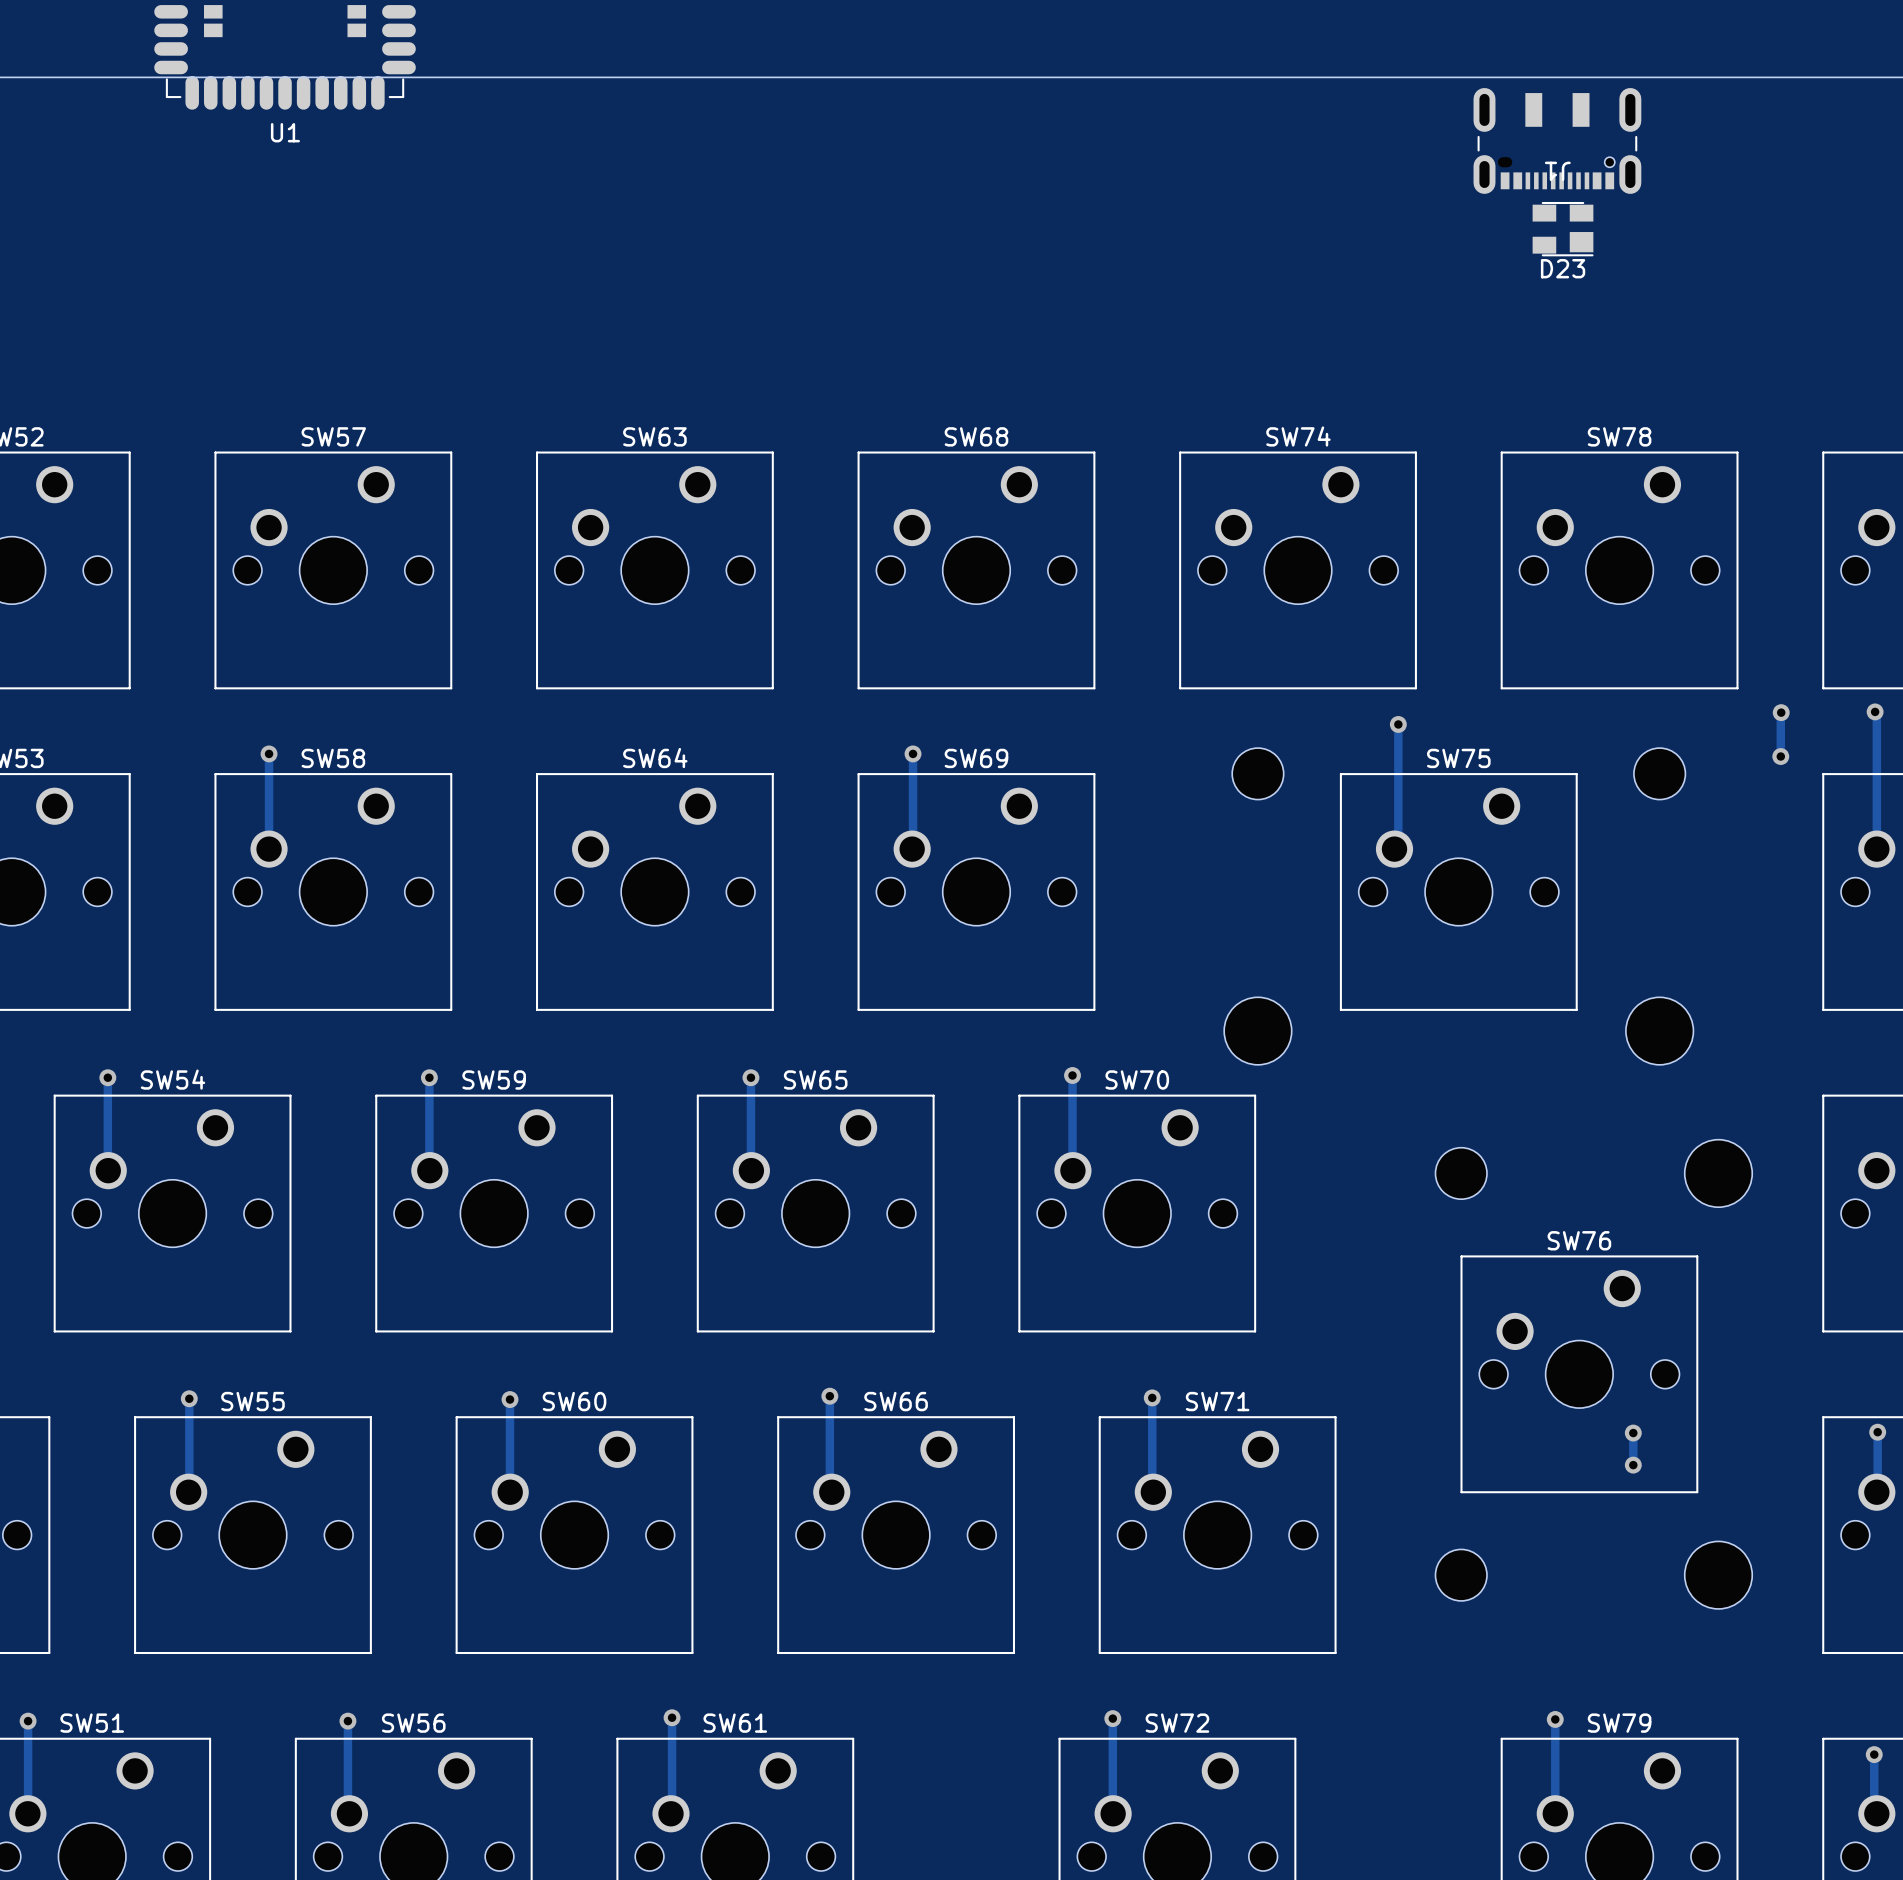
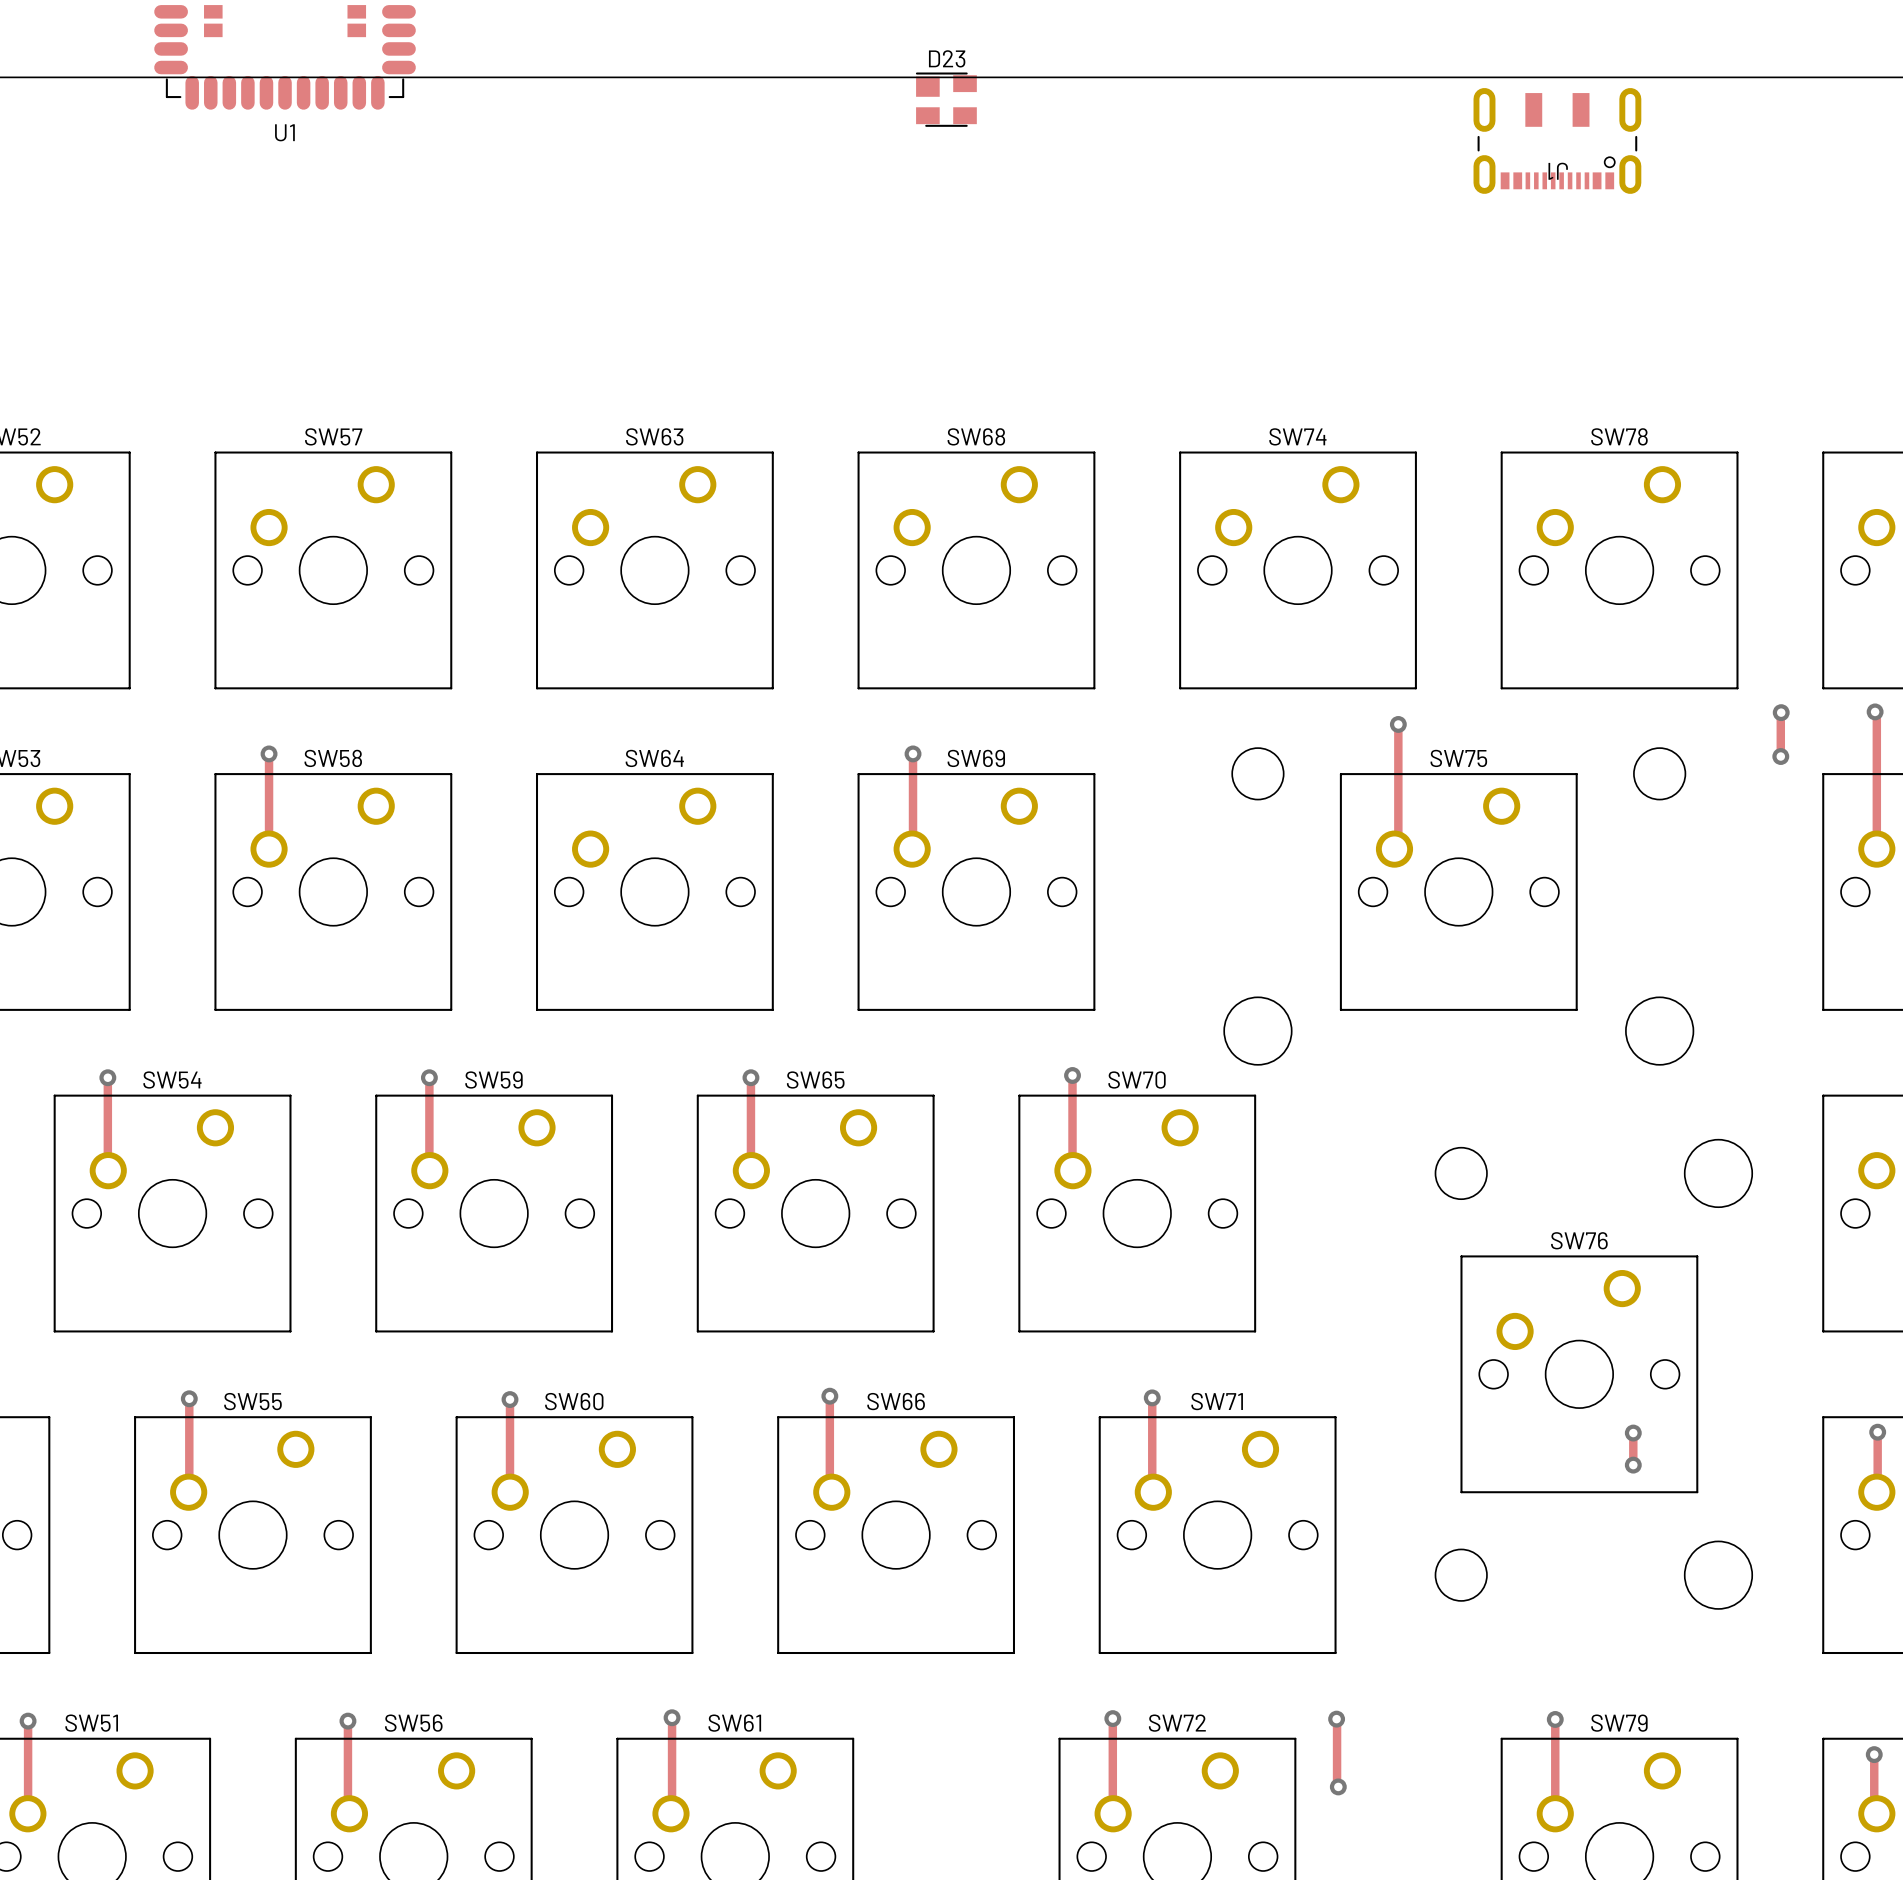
D23 rotation: 0° (1563, 229) -> 180° (946, 99)
D23 position: (1563, 229) -> (946, 99)
track: none -> (1337, 1718) (1338, 1786)
via: none -> (1336, 1719)
via: none -> (1338, 1786)

